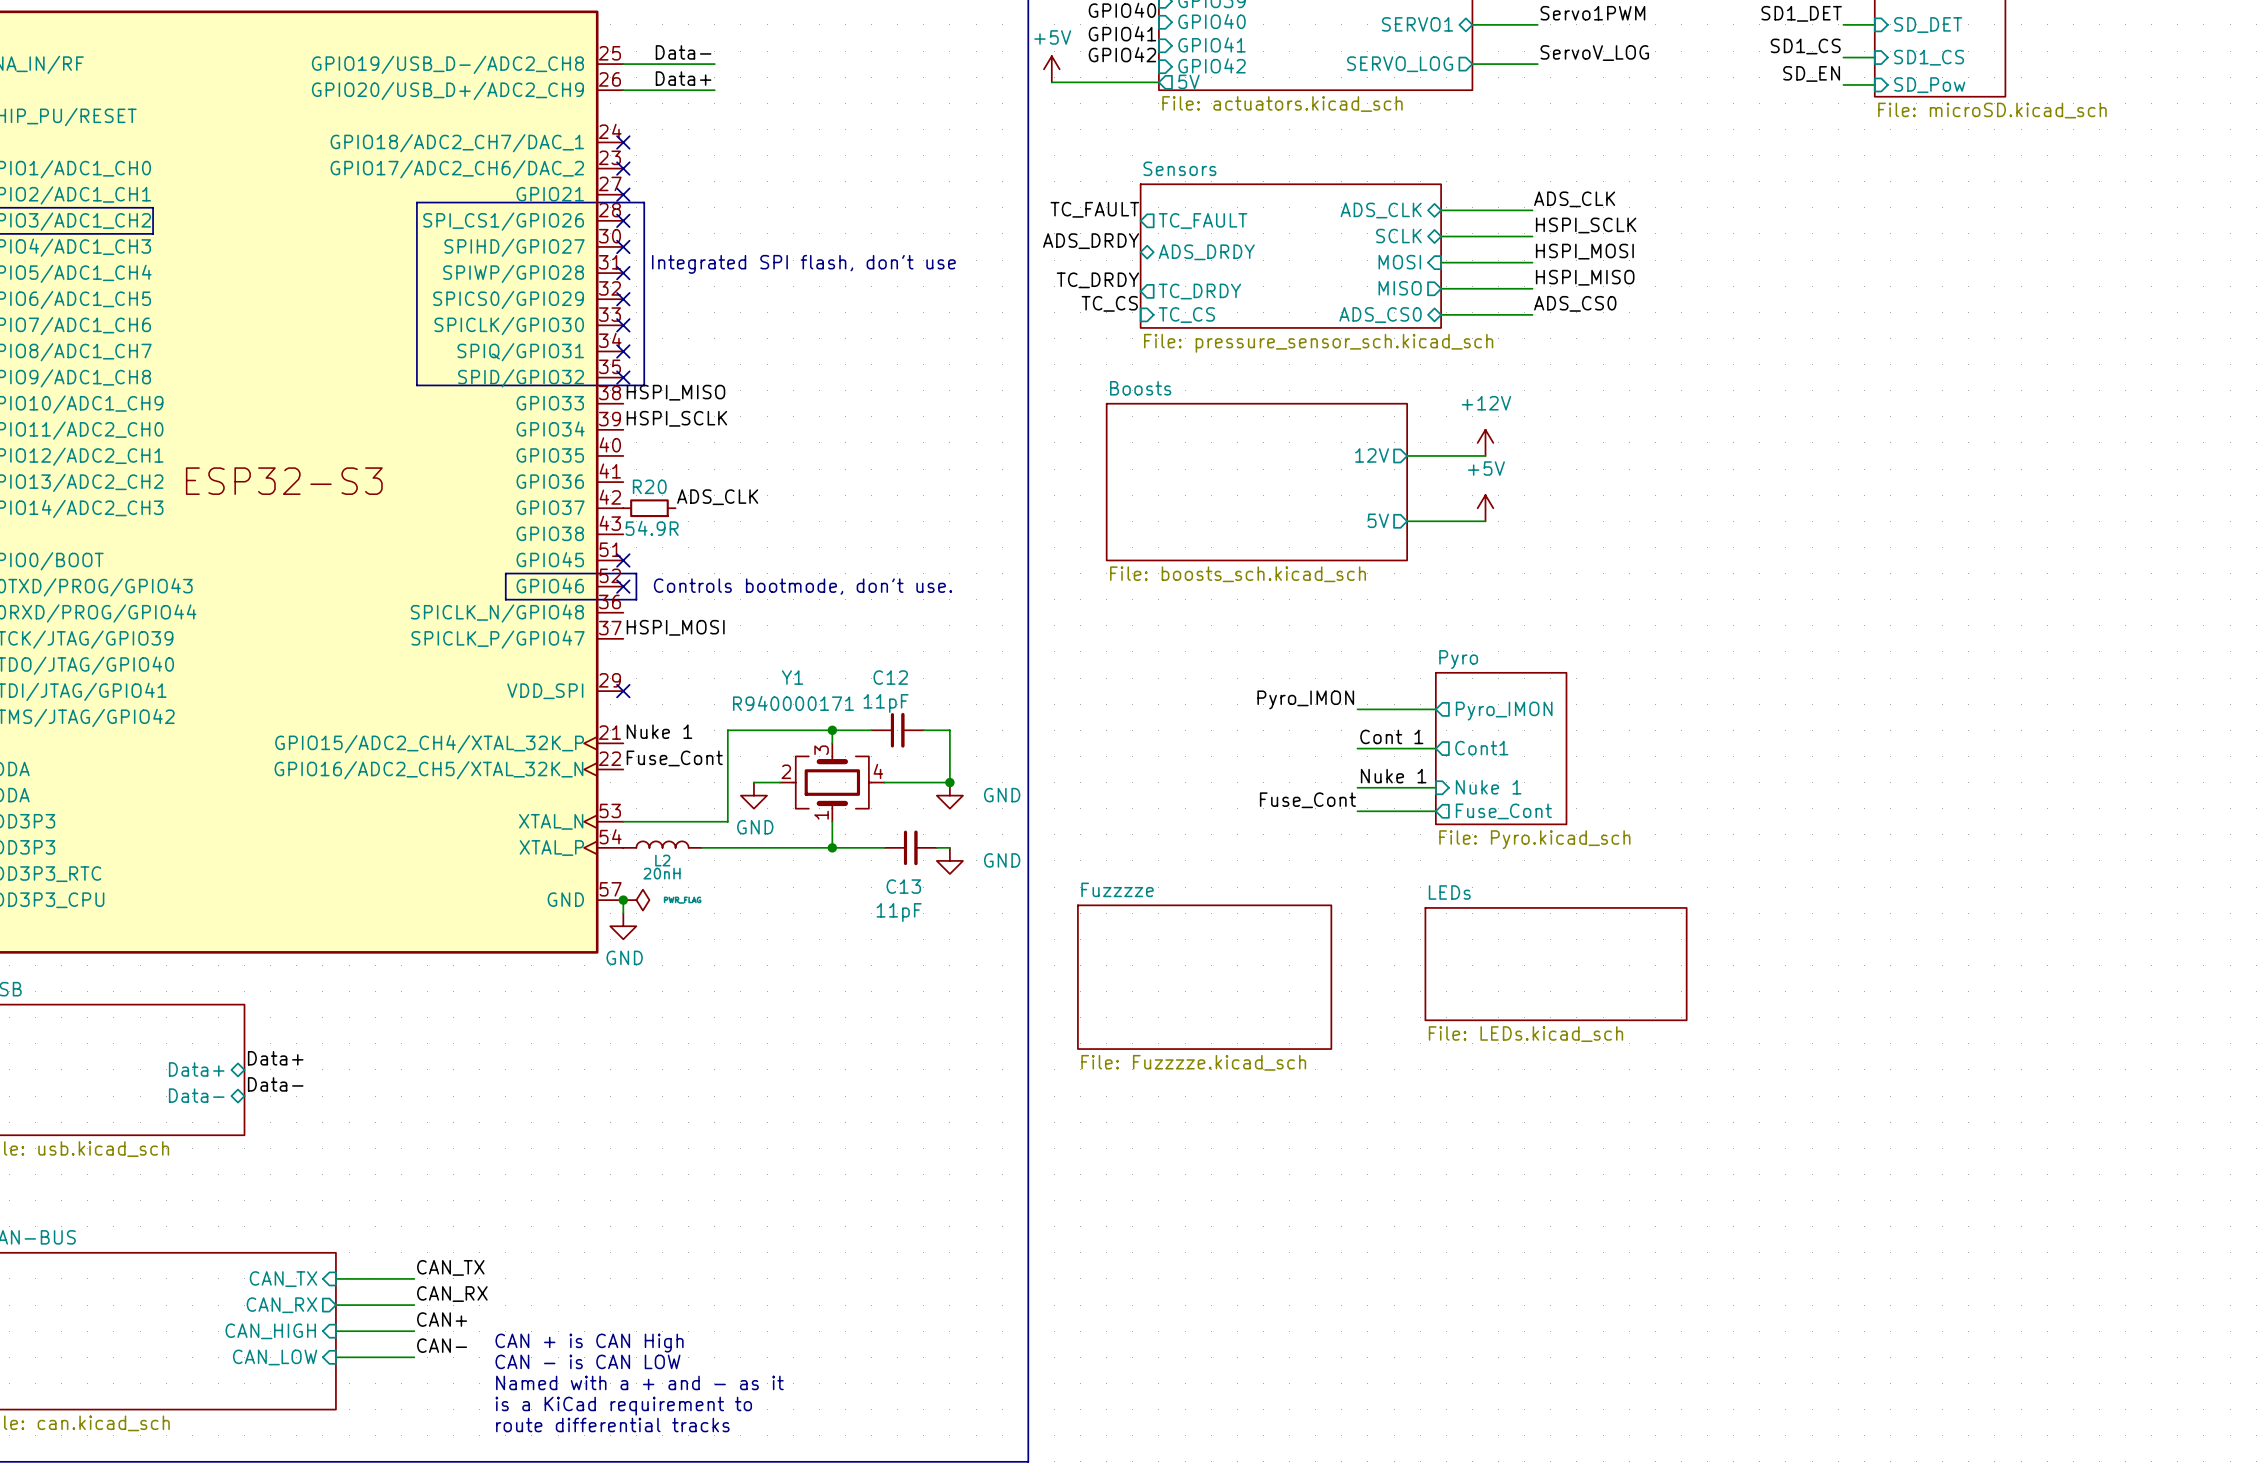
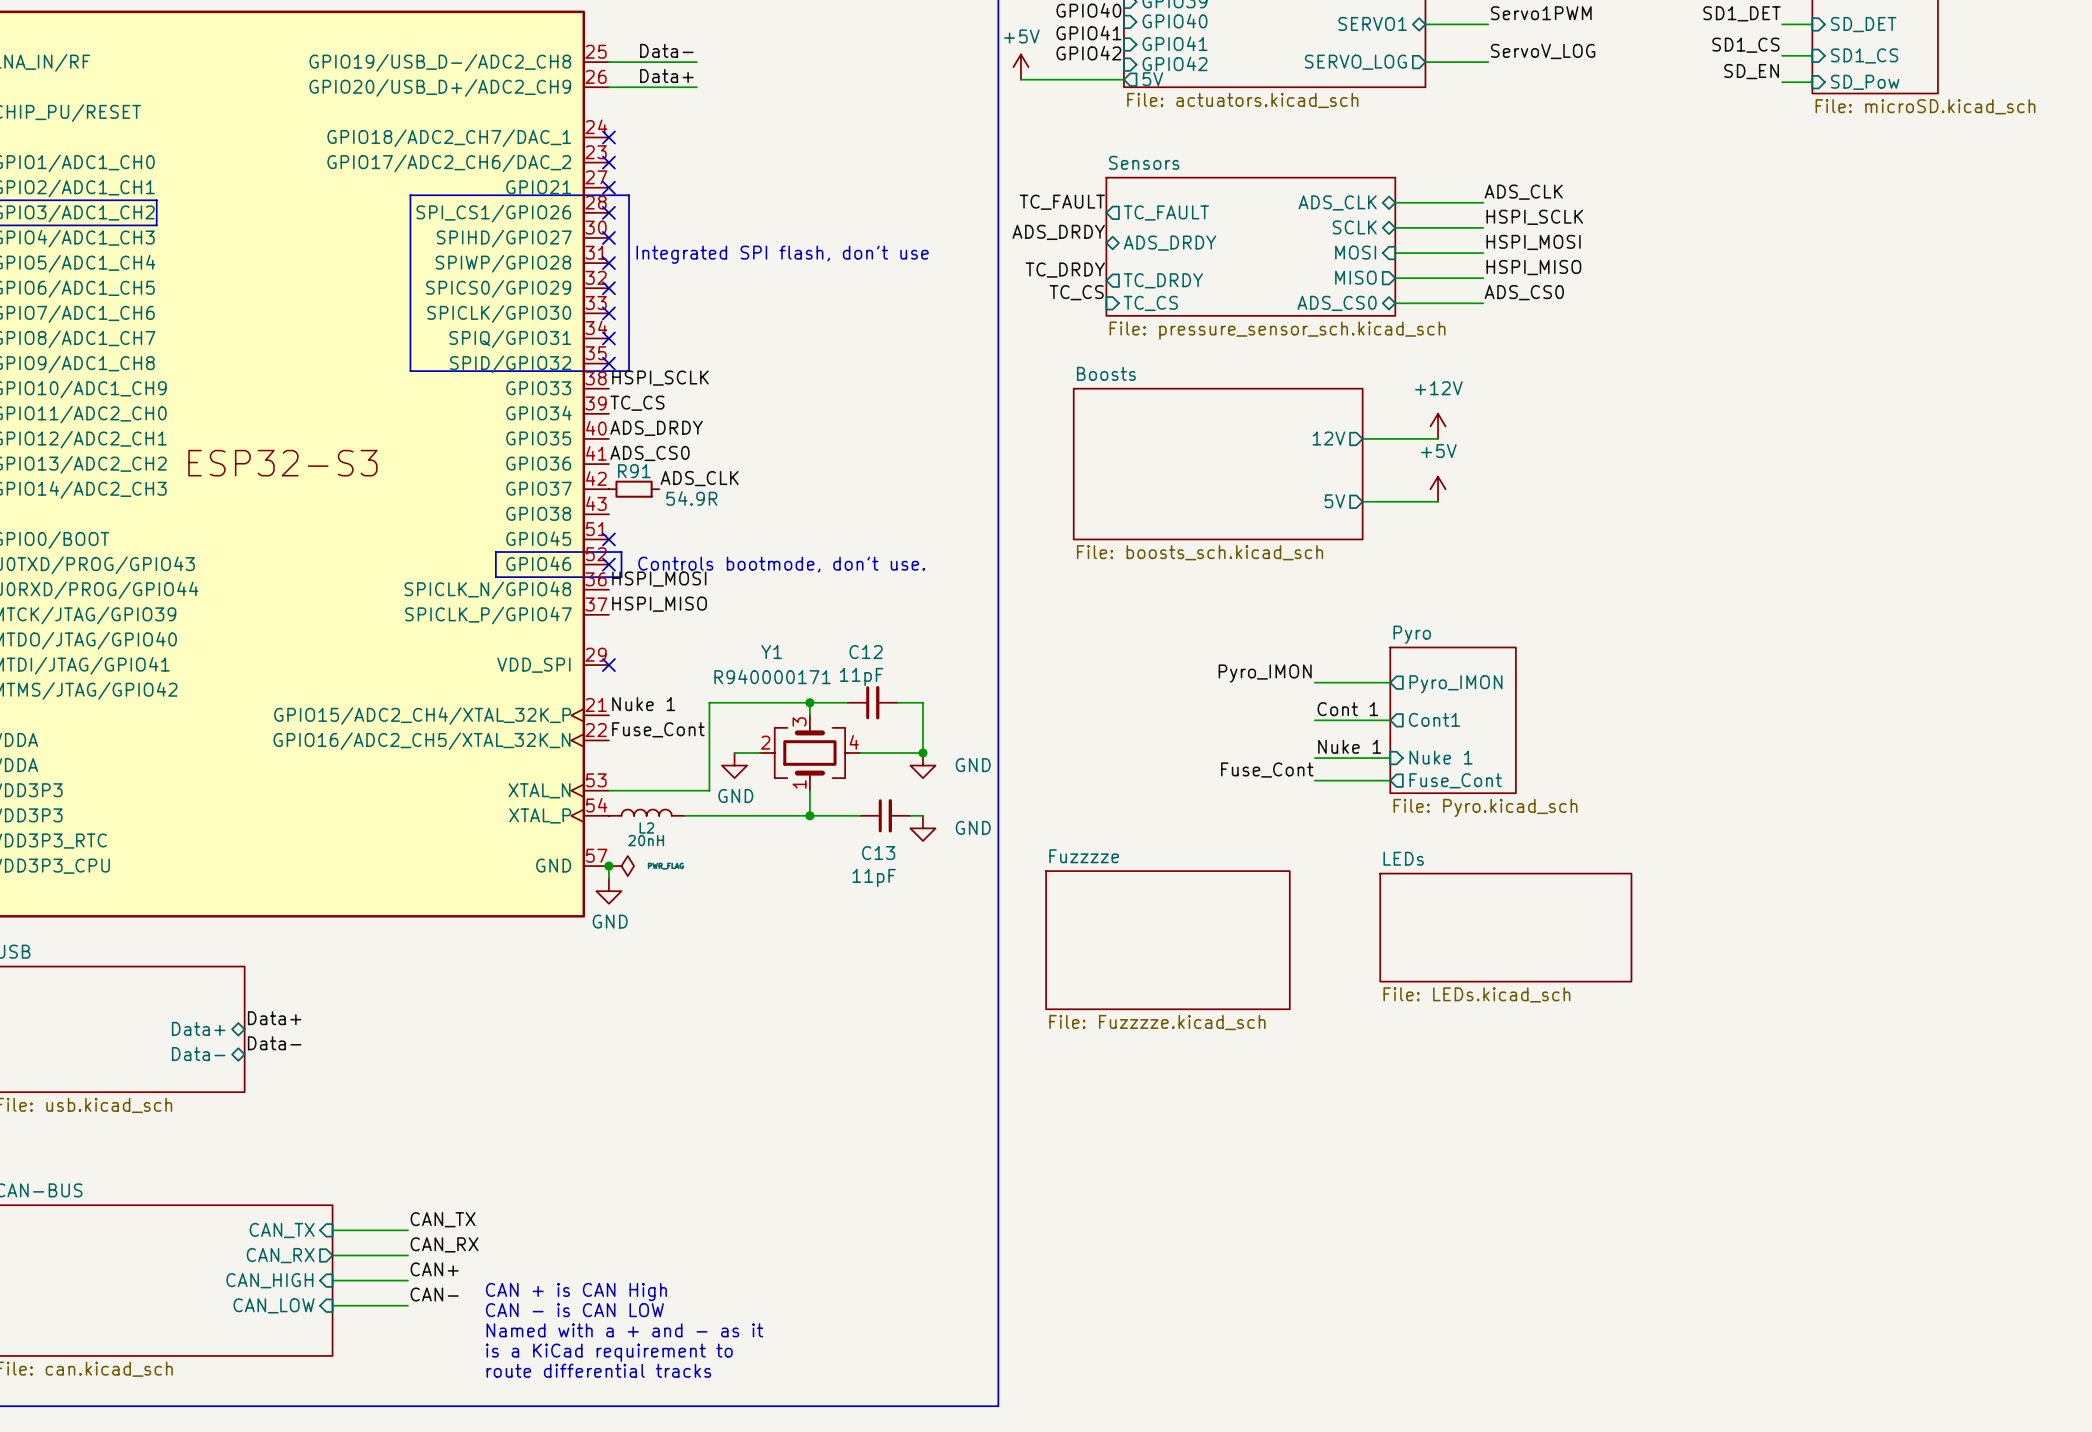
label: HSPI_MISO (675, 392) -> HSPI_SCLK (660, 378)
label: HSPI_SCLK (676, 418) -> TC_CS (637, 403)
label: none -> ADS_DRDY (656, 428)
label: none -> ADS_CS0 (650, 453)
R20 name: R20 (649, 486) -> R91 (634, 471)
R20 value position: 54.9R (652, 528) -> 54.9R (691, 498)
label: none -> HSPI_MOSI (659, 579)
label: HSPI_MOSI (675, 627) -> HSPI_MISO (659, 604)

